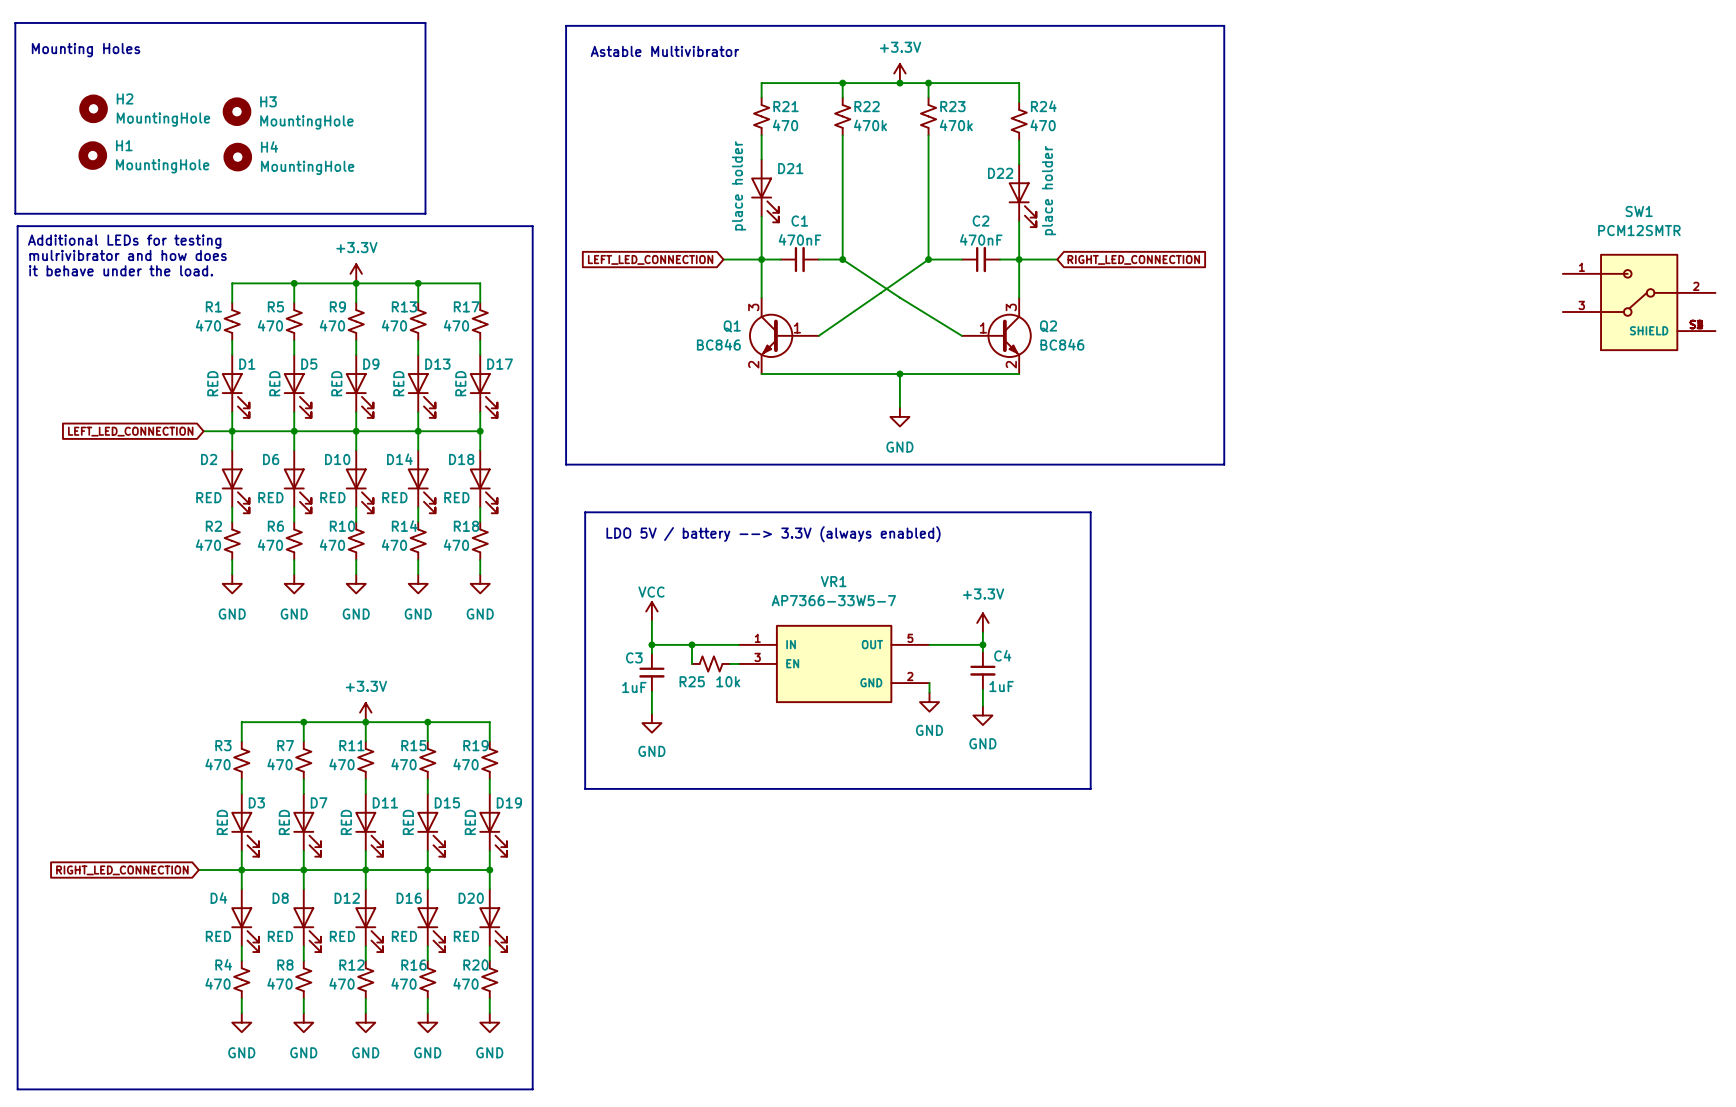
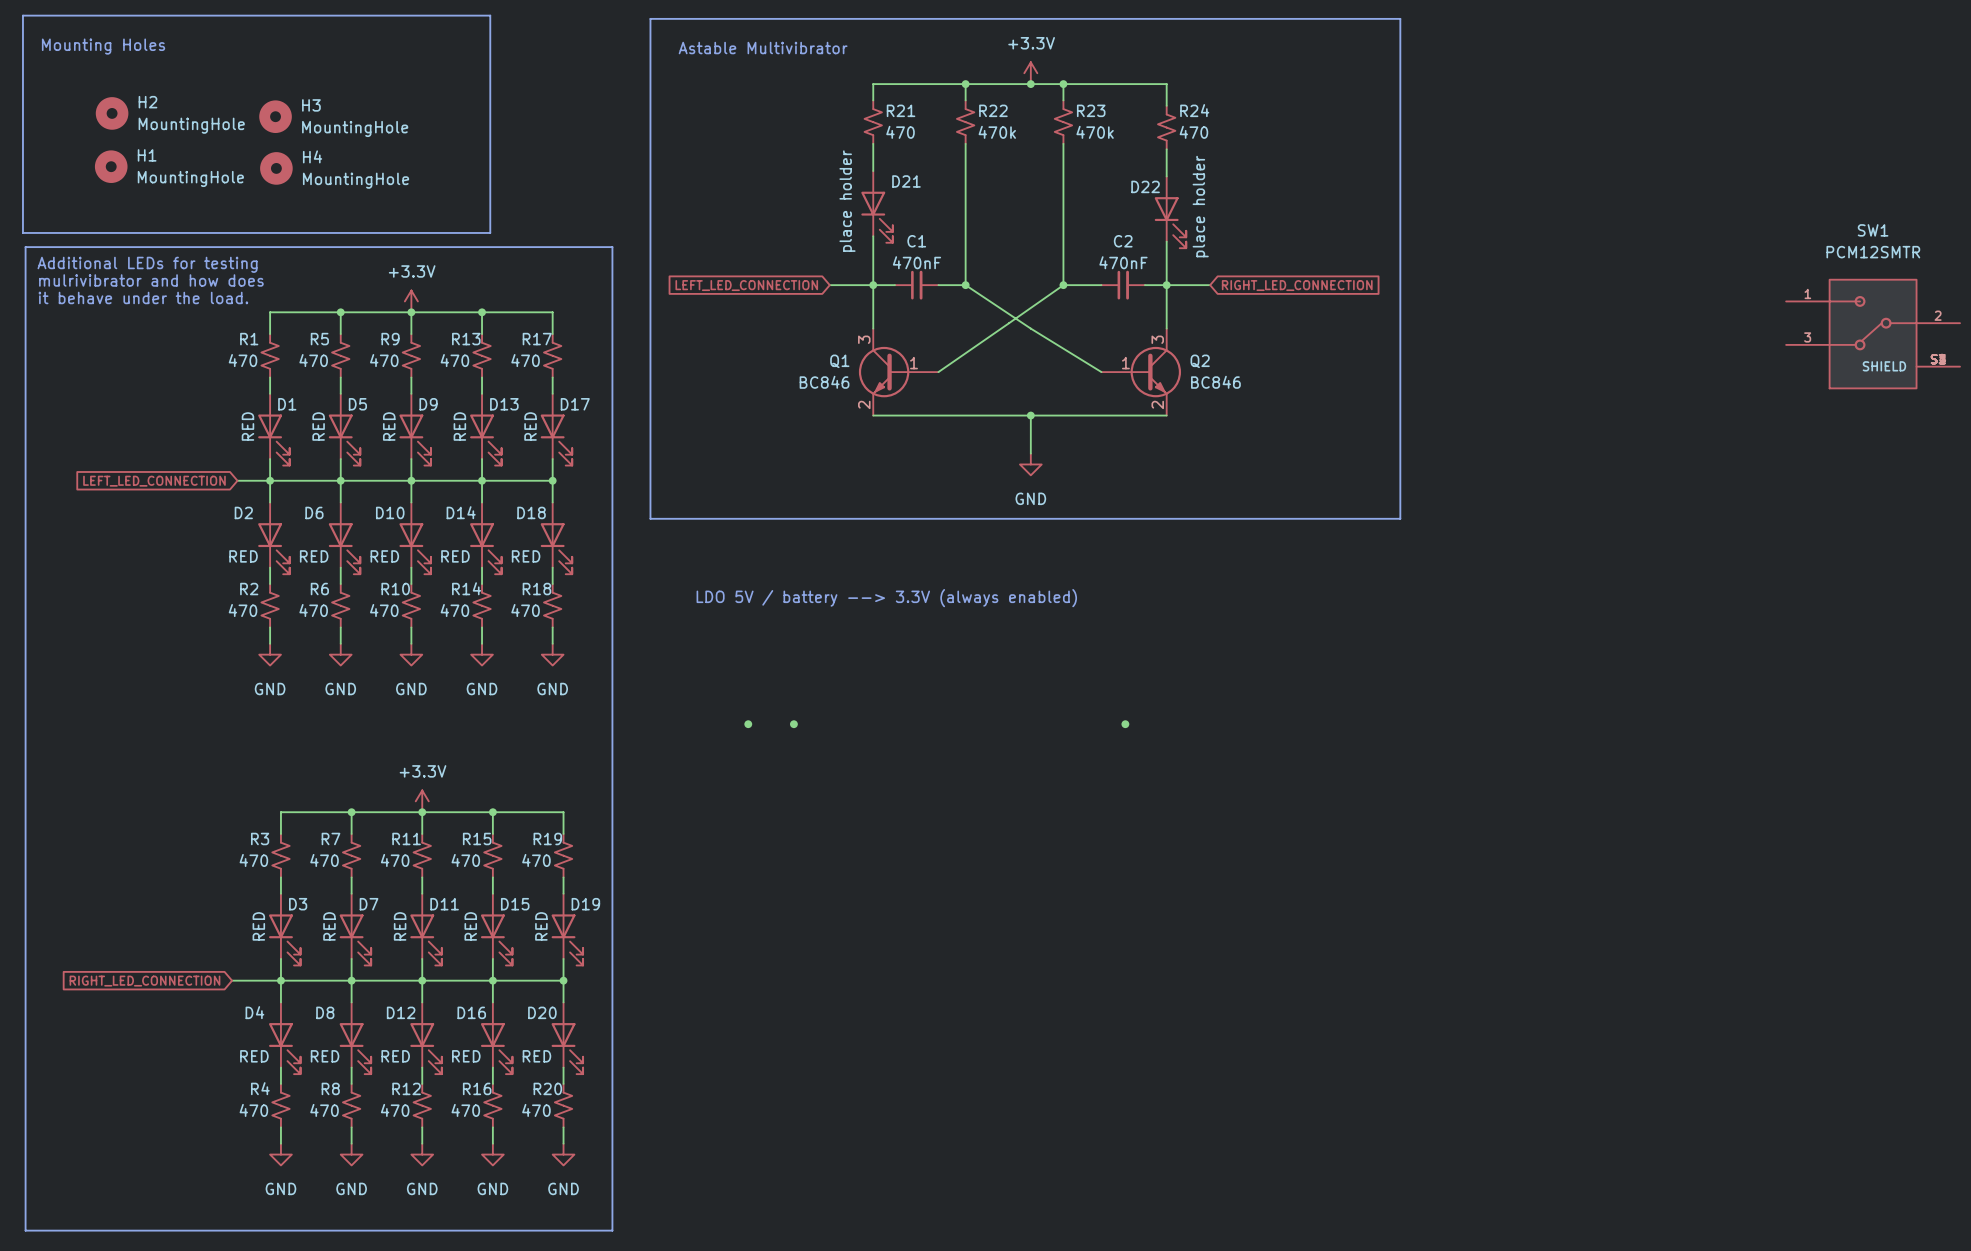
line: (585, 512) (1090, 512) (1090, 788) (585, 788) (585, 512) -> none
power symbol: VCC (651, 611) -> none
wire: (651, 621) (651, 653) -> none
power symbol: +3.3V (982, 622) -> none
wire: (982, 632) (982, 651) -> none
wire: (651, 644) (738, 644) -> none
wire: (691, 644) (691, 663) -> none
wire: (929, 644) (982, 644) -> none
R25: 10k (711, 663) -> none
wire: (730, 663) (738, 663) -> none
VR1: AP7366-33W5-7 (834, 663) -> none
C4: 1uF (982, 670) -> none
C3: 1uF (651, 672) -> none
wire: (929, 683) (929, 692) -> none
wire: (982, 689) (982, 705) -> none
wire: (651, 691) (651, 713) -> none
power symbol: GND (929, 702) -> none
power symbol: GND (982, 715) -> none
power symbol: GND (651, 723) -> none

